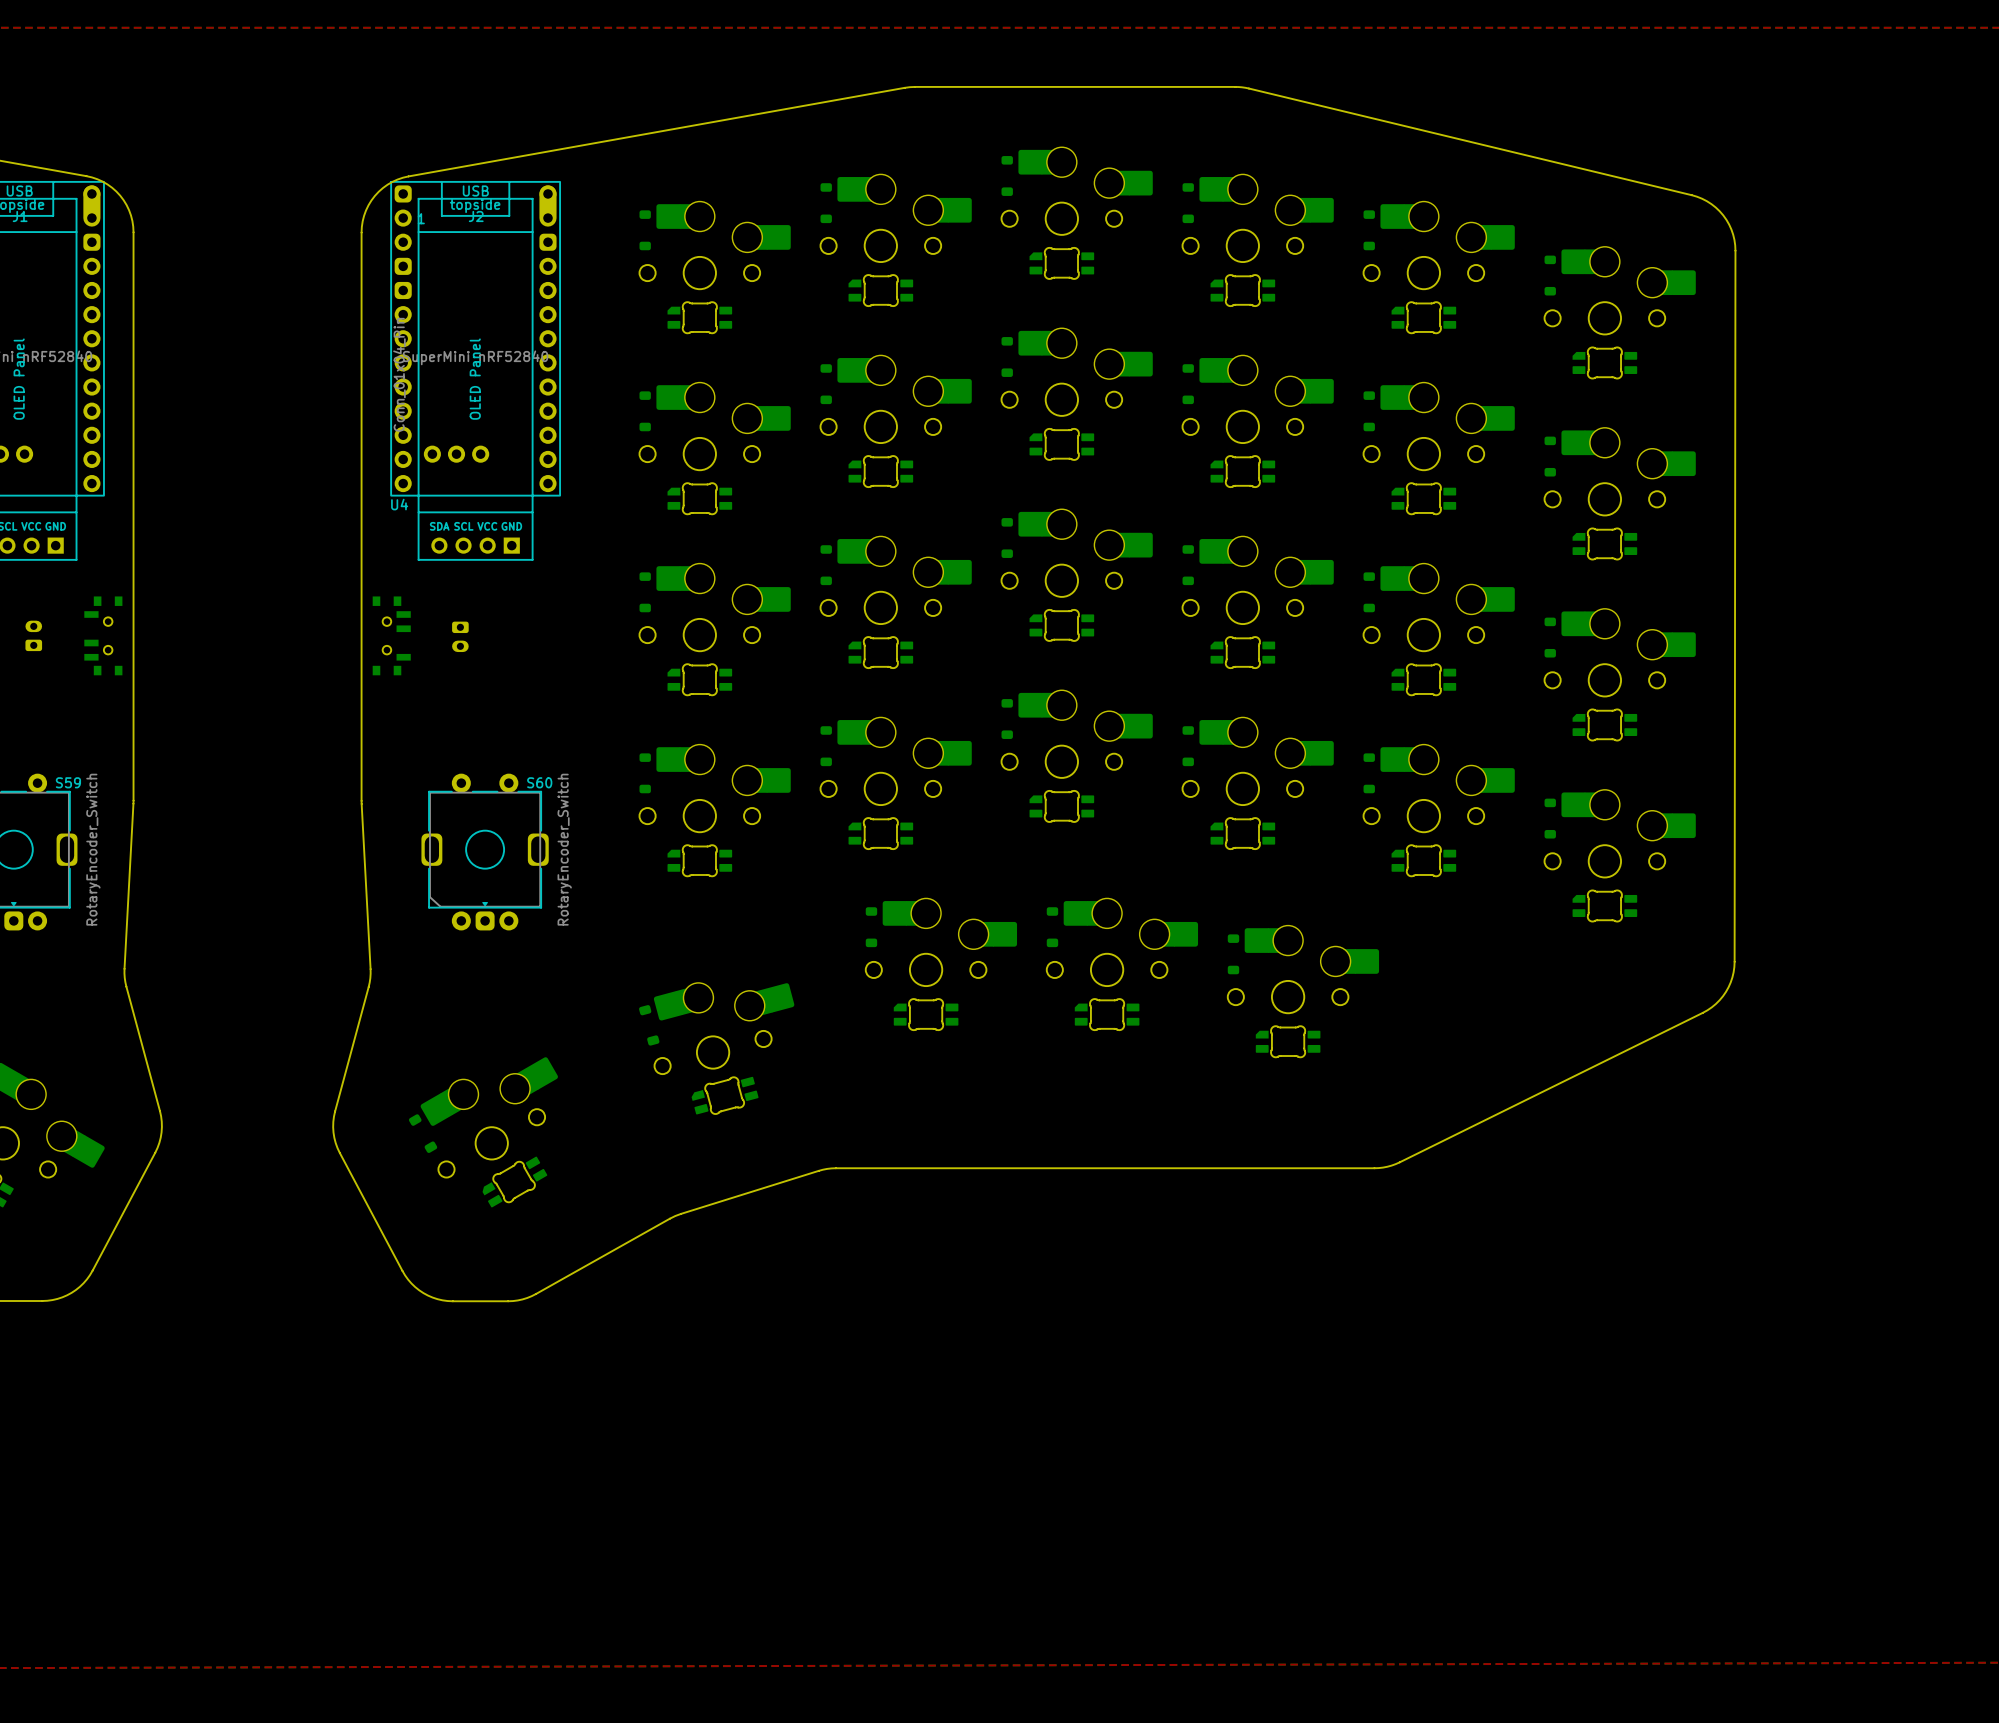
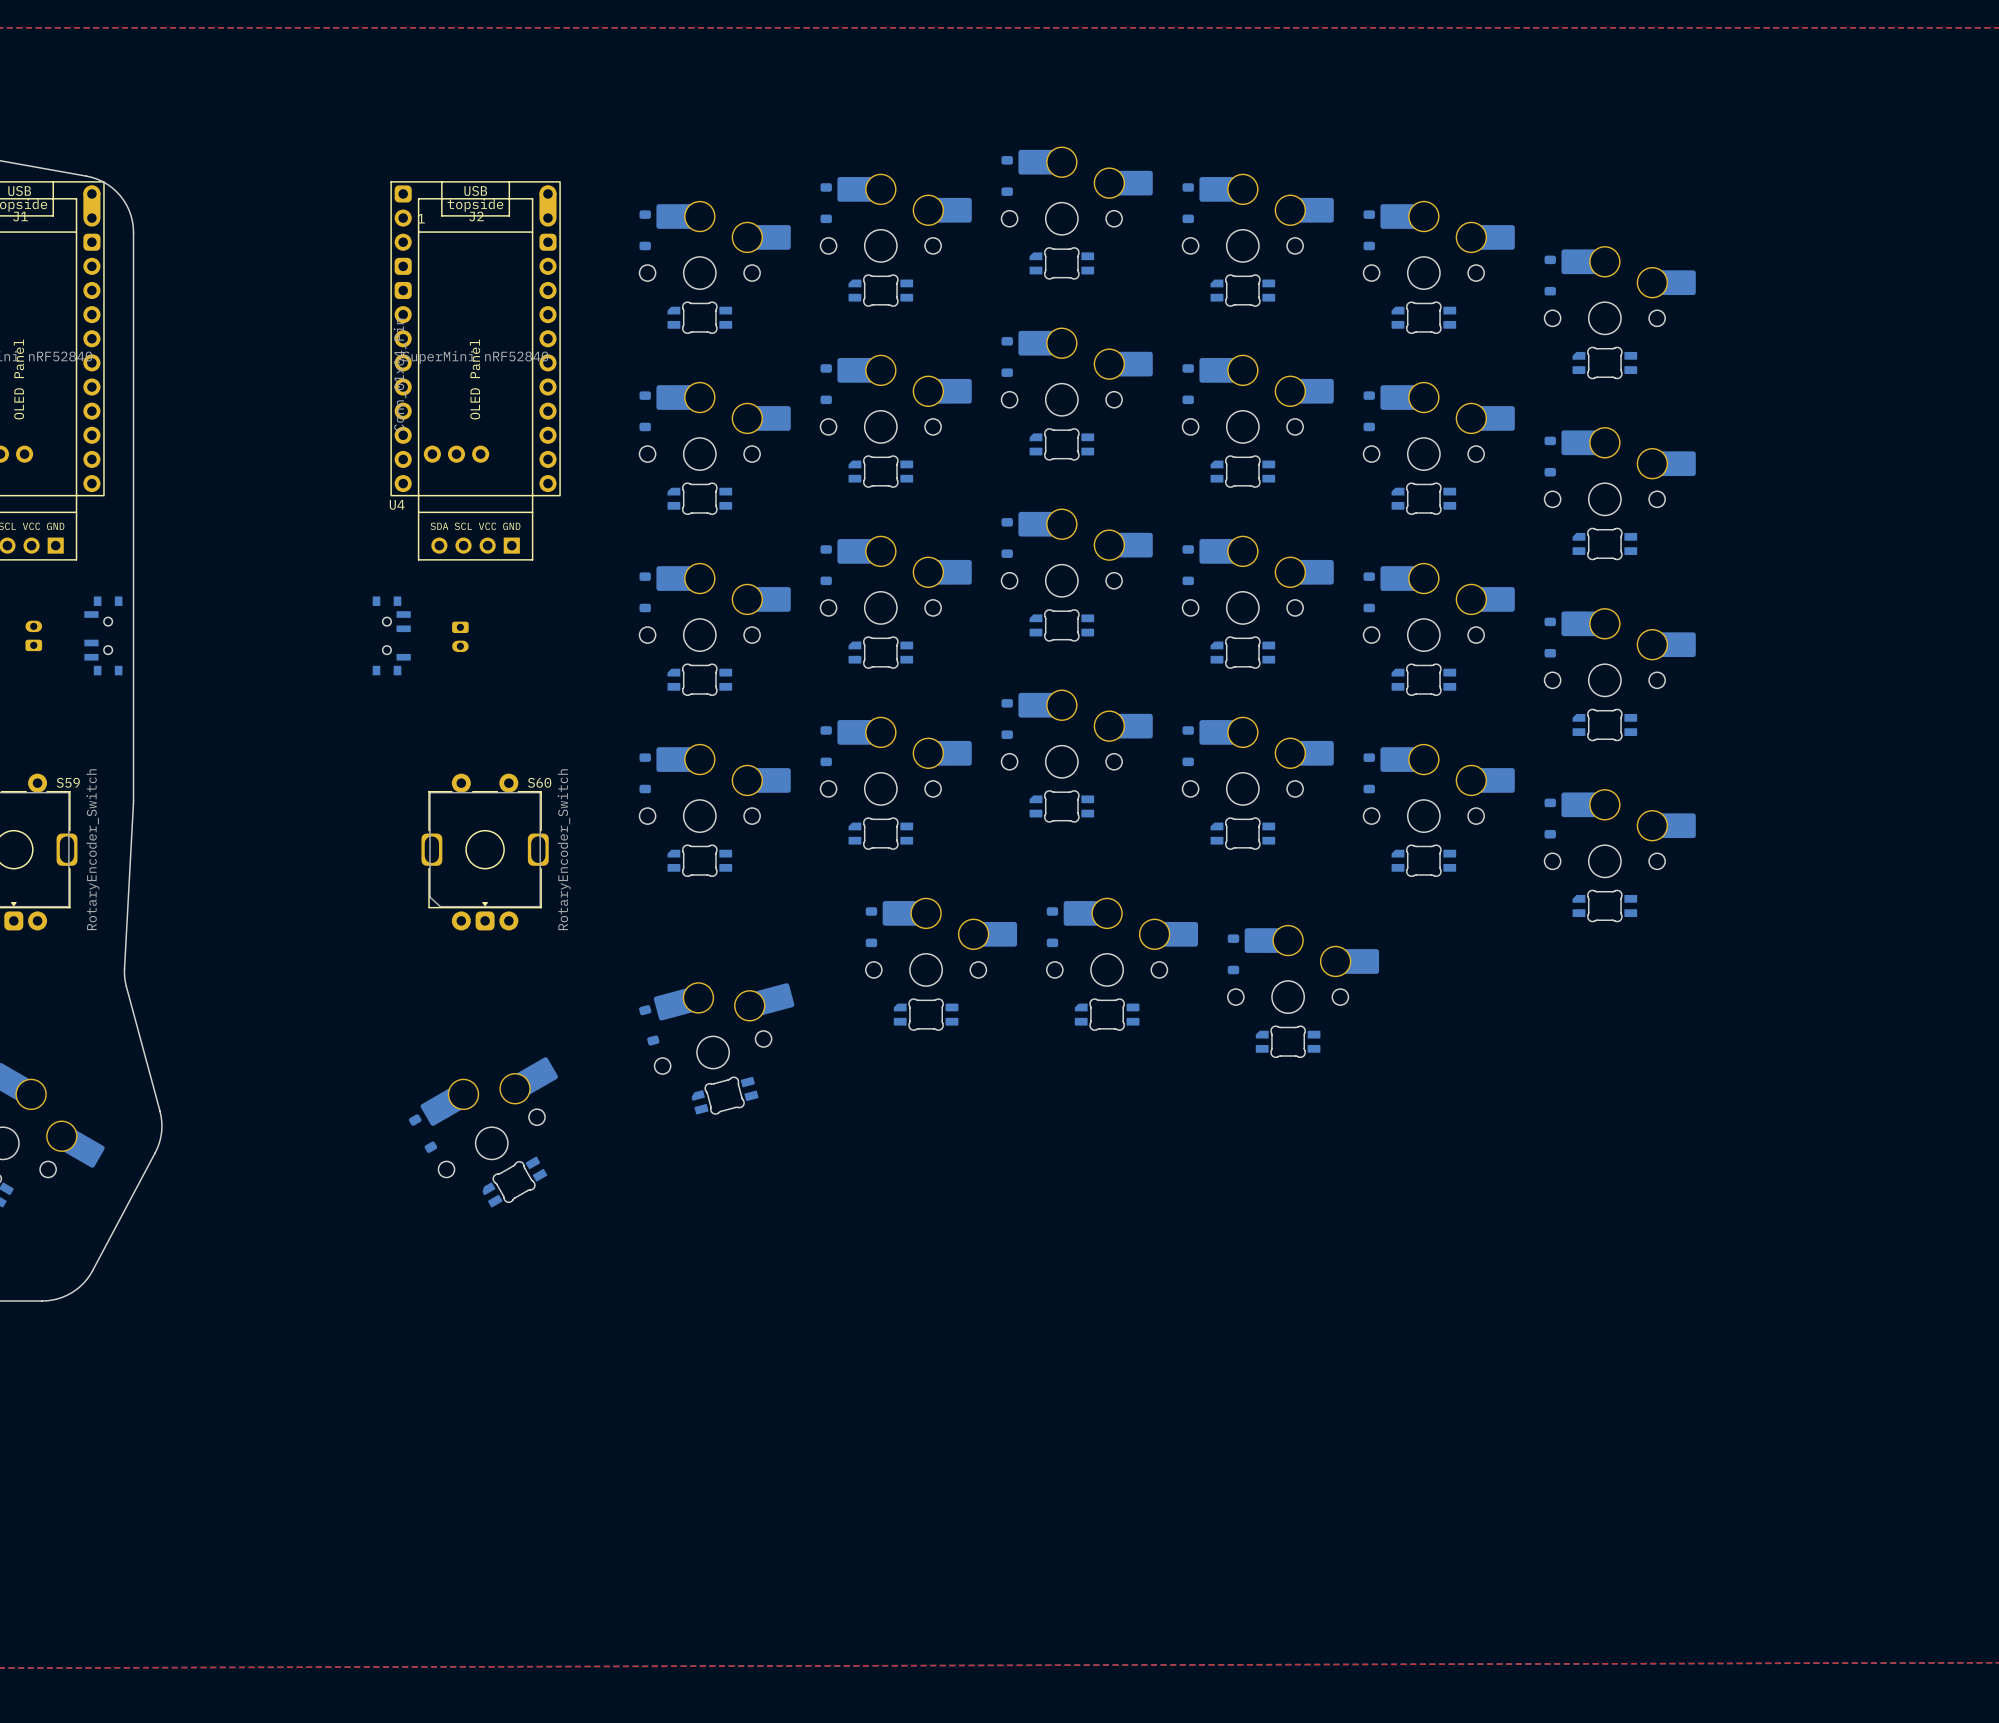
board edge: (914, 86) (1245, 87) (1691, 195) (1706, 201) (1719, 211) (1731, 229) (1735, 250) (1734, 961) (1730, 982) (1719, 1000) (1702, 1012) (1387, 1166) (827, 1168) (675, 1216) (527, 1297) (513, 1301) (452, 1301) (432, 1297) (415, 1287) (402, 1270) (339, 1152) (334, 1137) (333, 1127) (335, 1111) (370, 973) (361, 800) (361, 232) (366, 210) (371, 200) (382, 188) (397, 179) (408, 176) (914, 86) -> none

